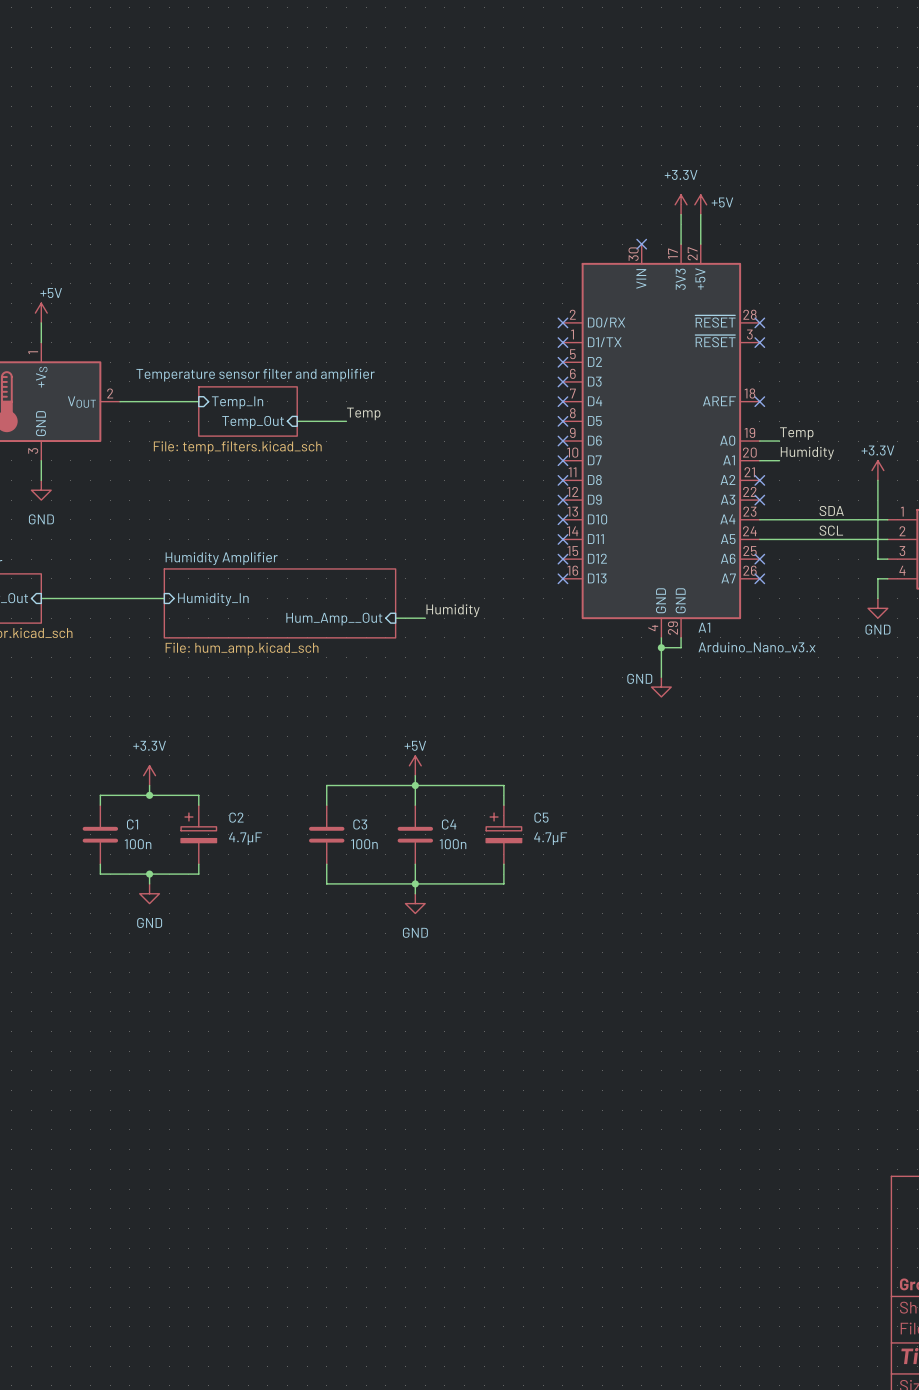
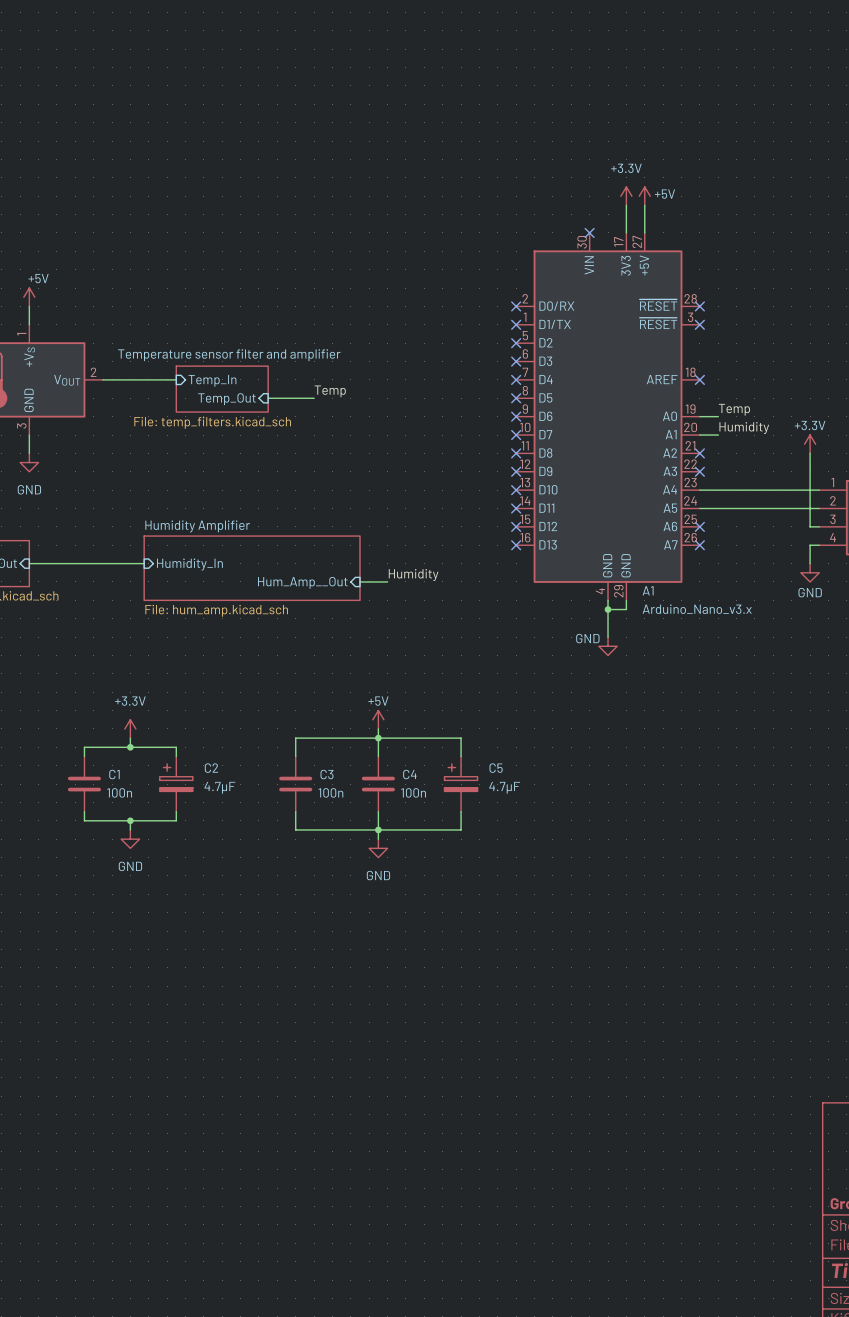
label: SDA (831, 510) -> none
label: SCL (831, 530) -> none

